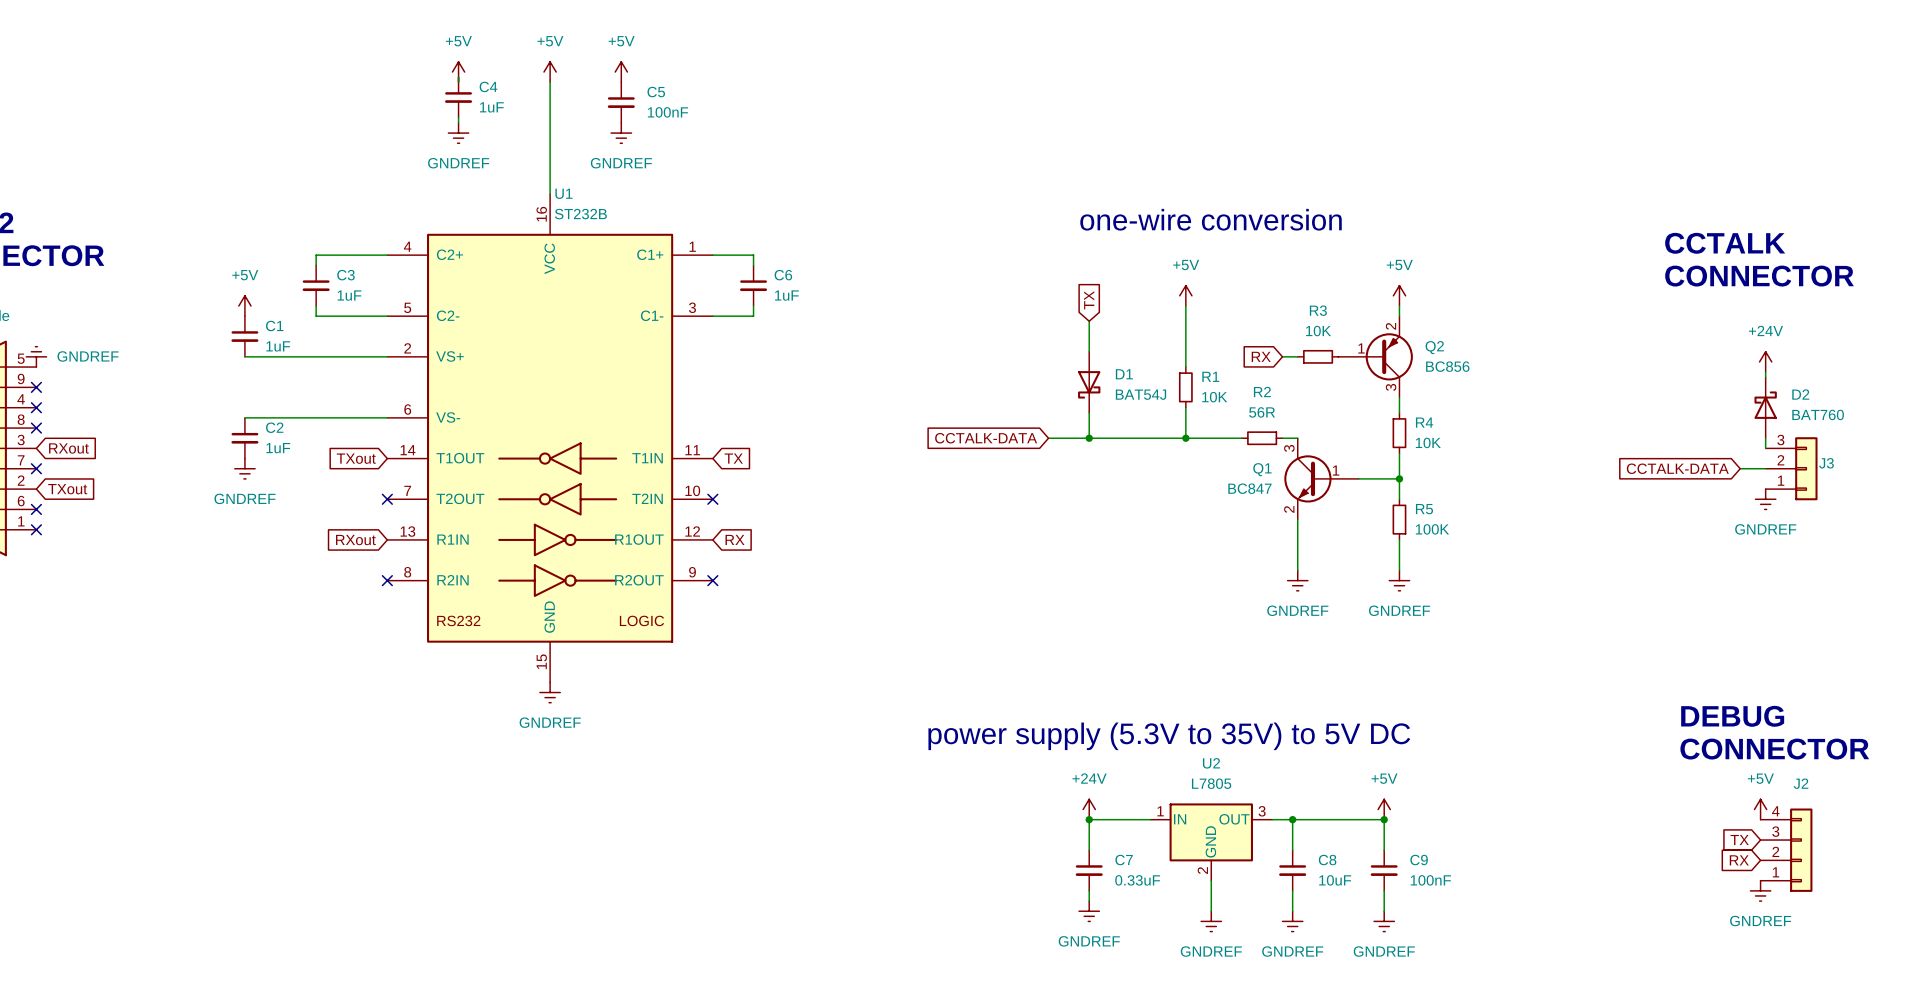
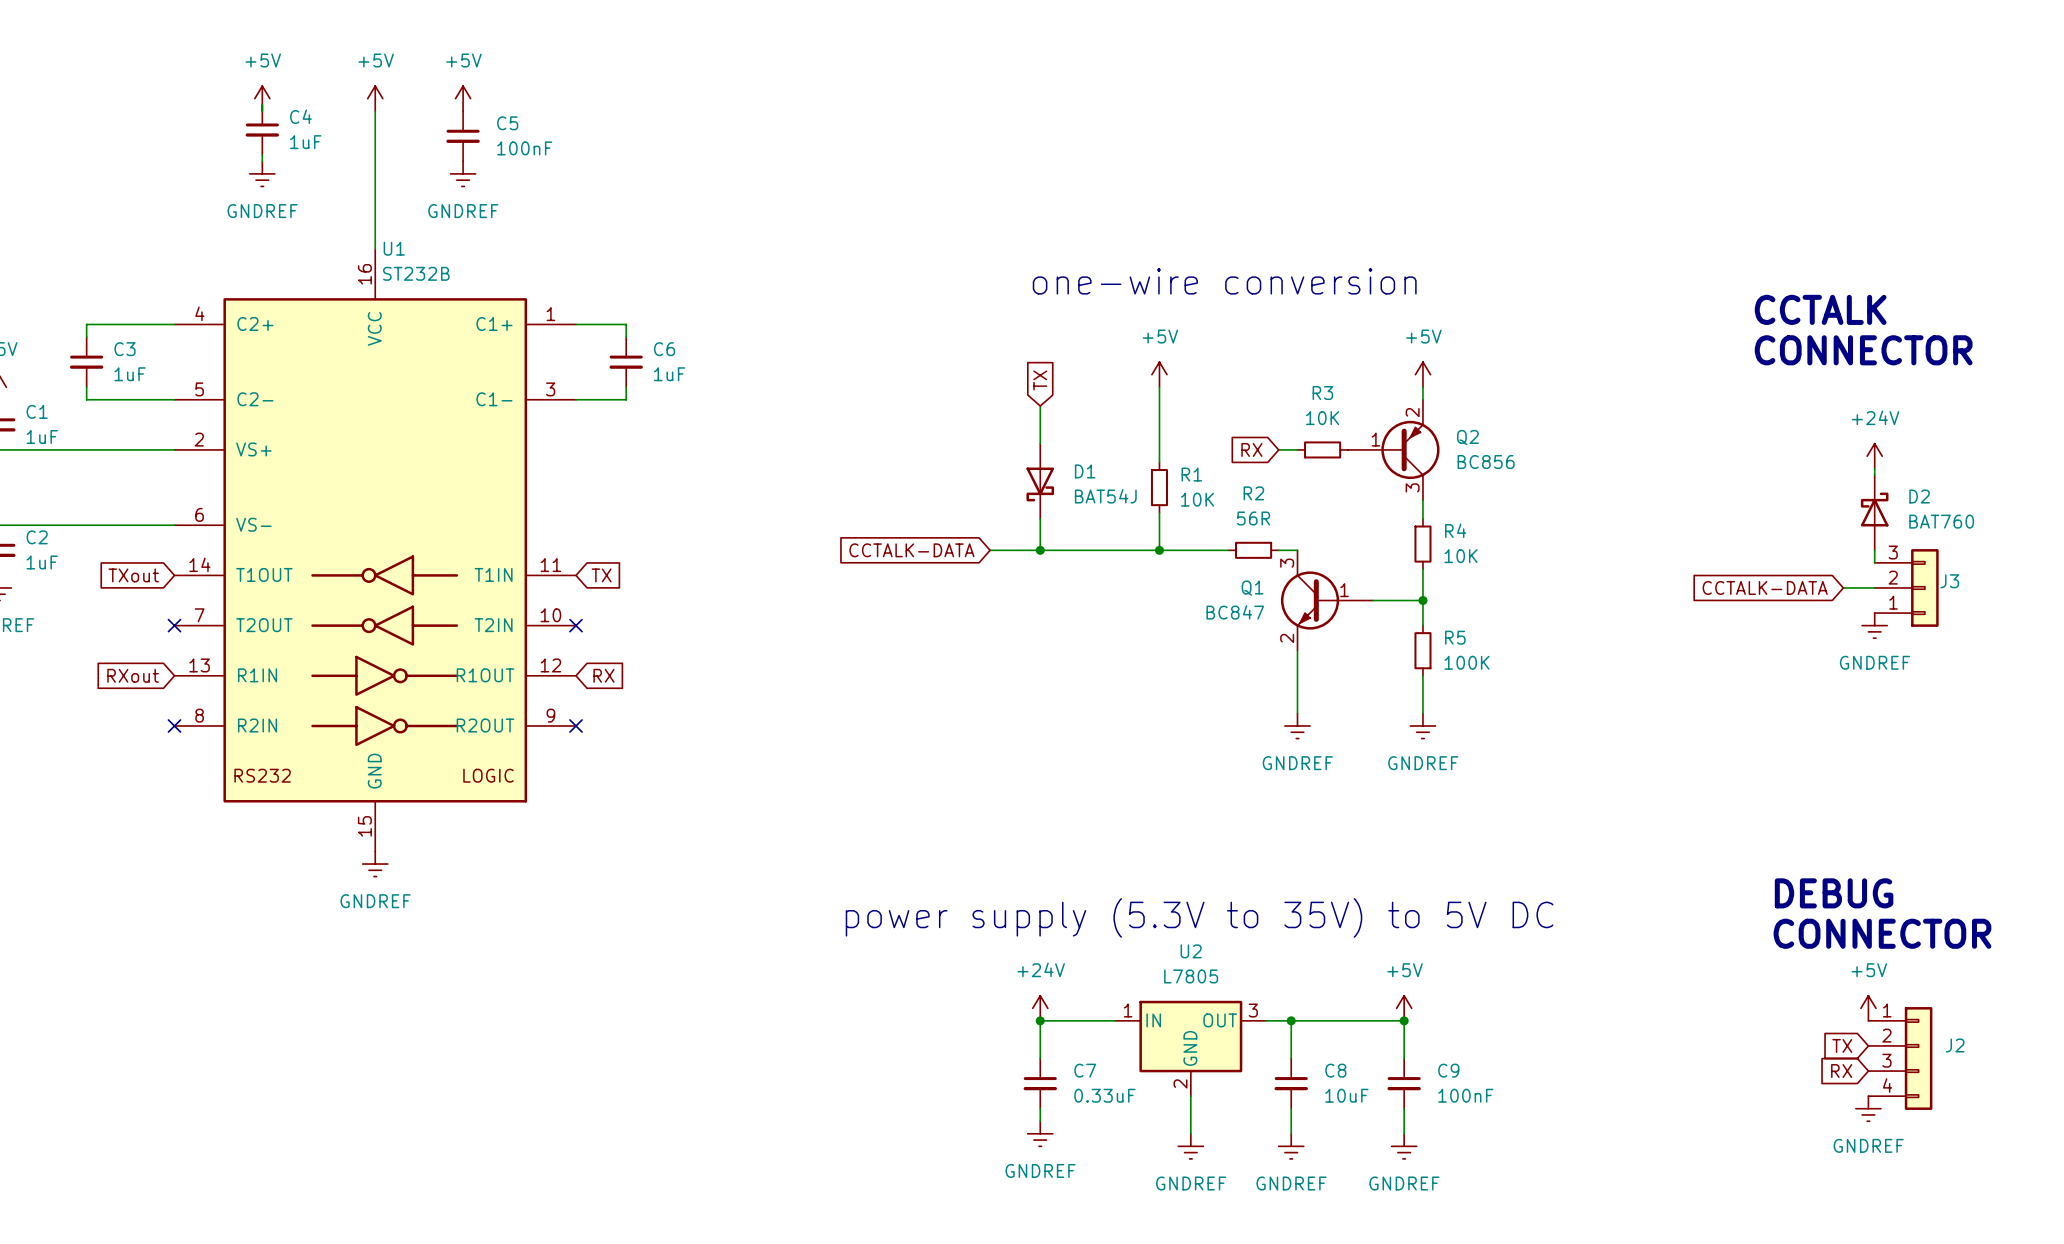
J2 name position: J2 (1801, 783) -> J2 (1955, 1045)
J2 flip: as is (1801, 850) -> up-down (1918, 1058)

